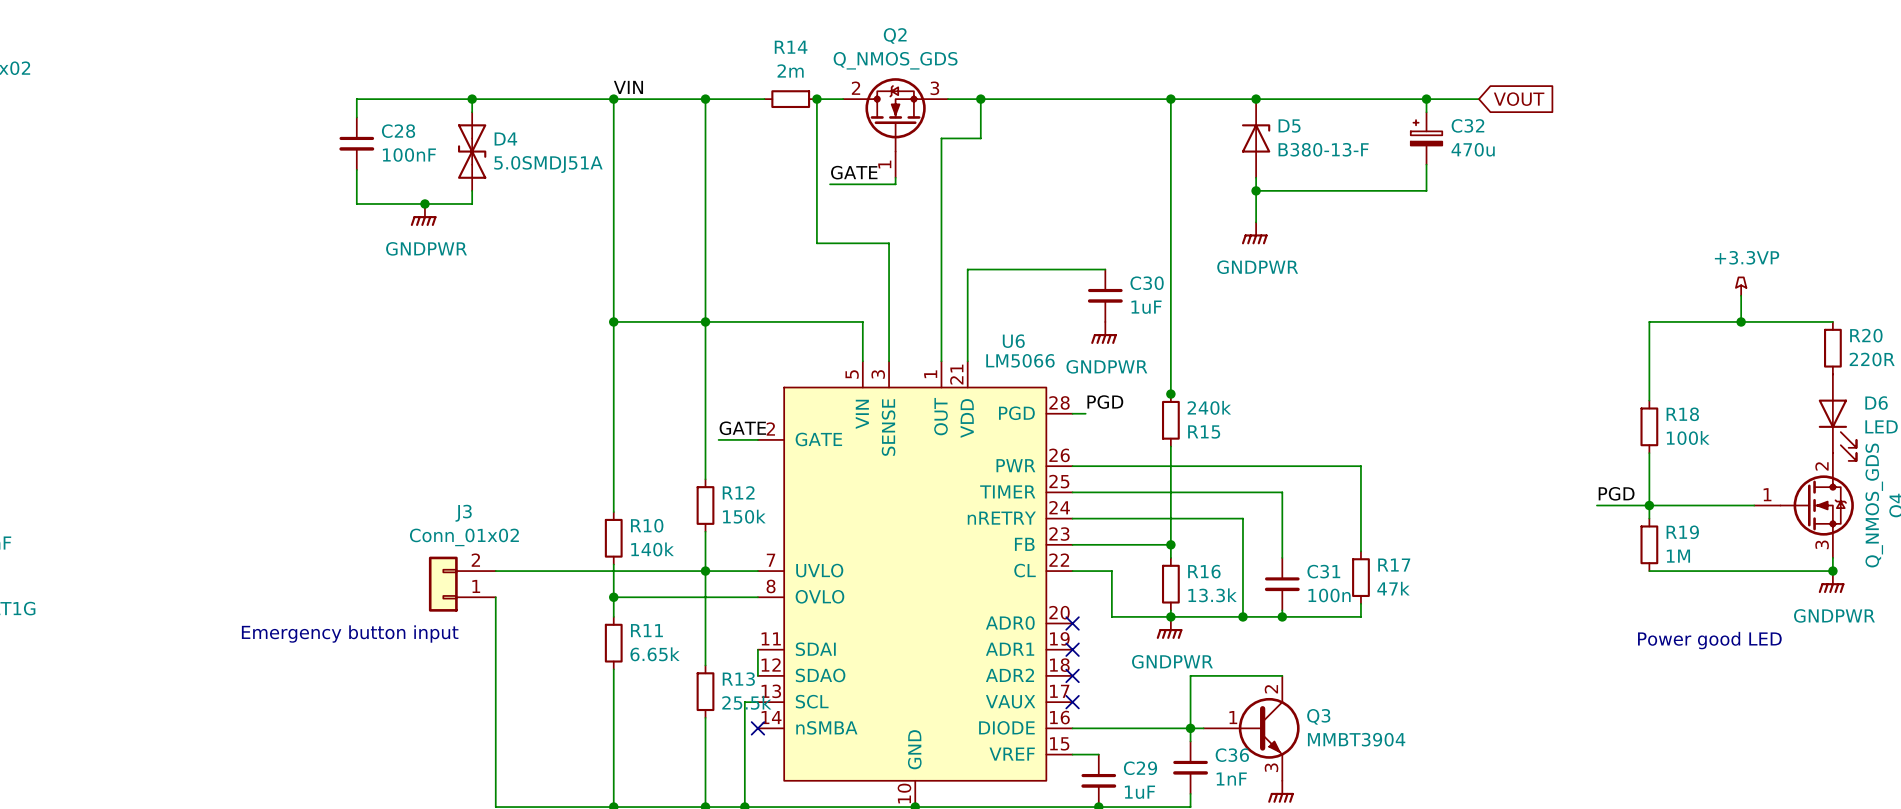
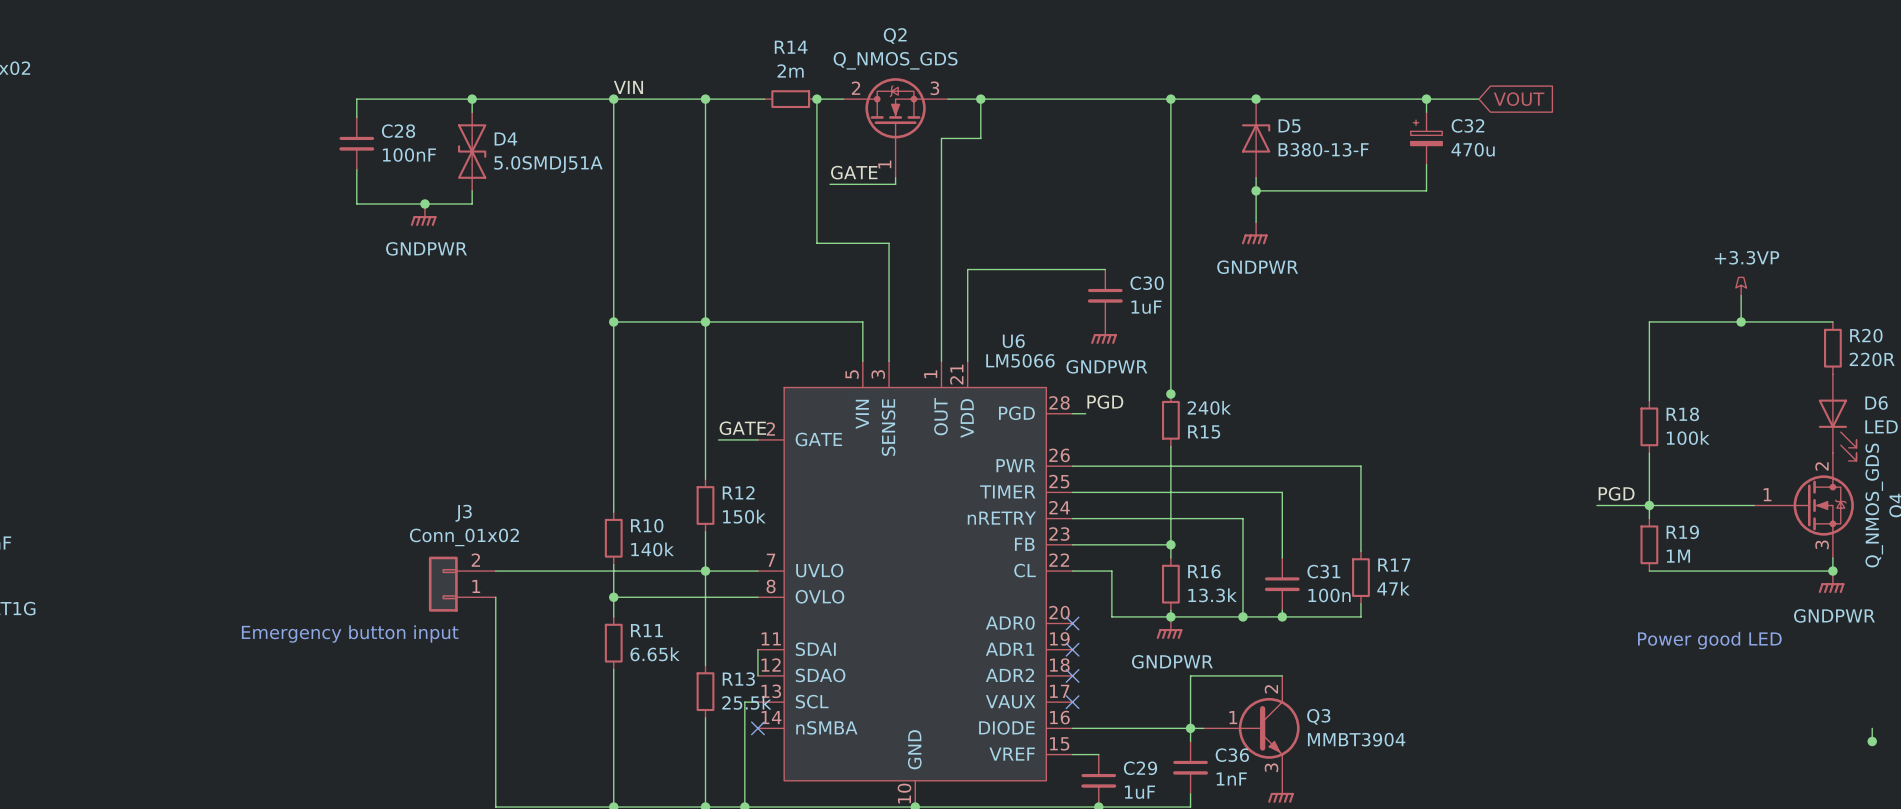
wire: none -> (1872, 728) (1872, 741)
junction: none -> (1872, 741)

